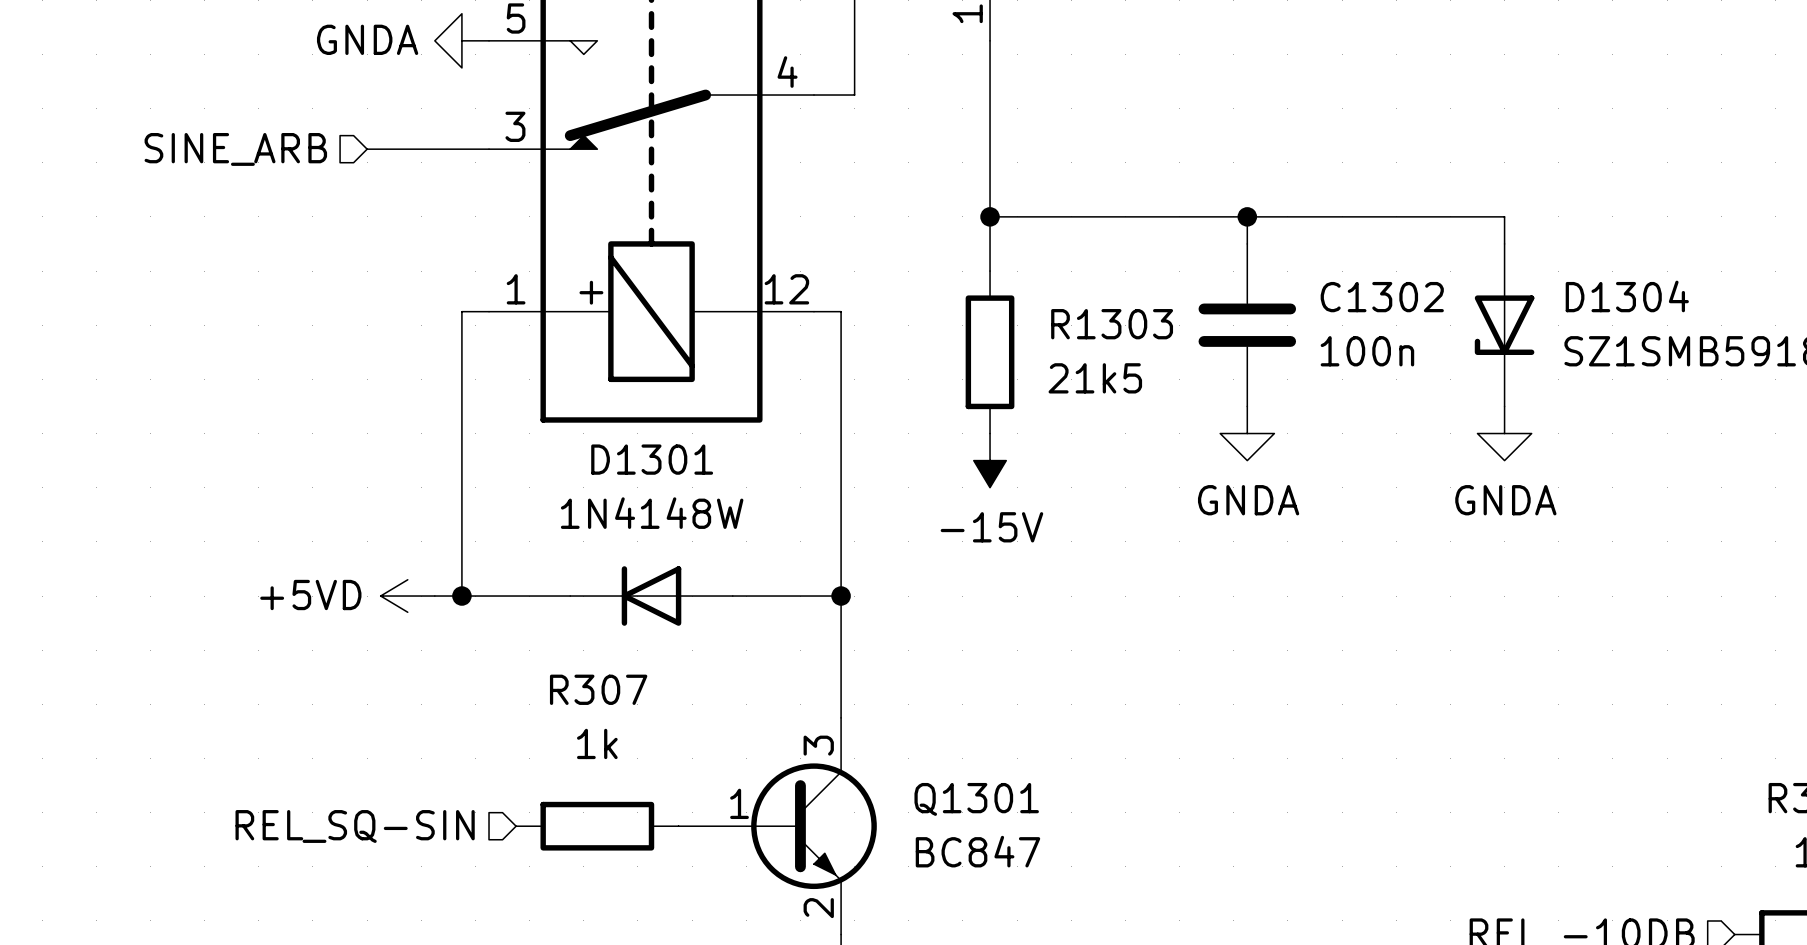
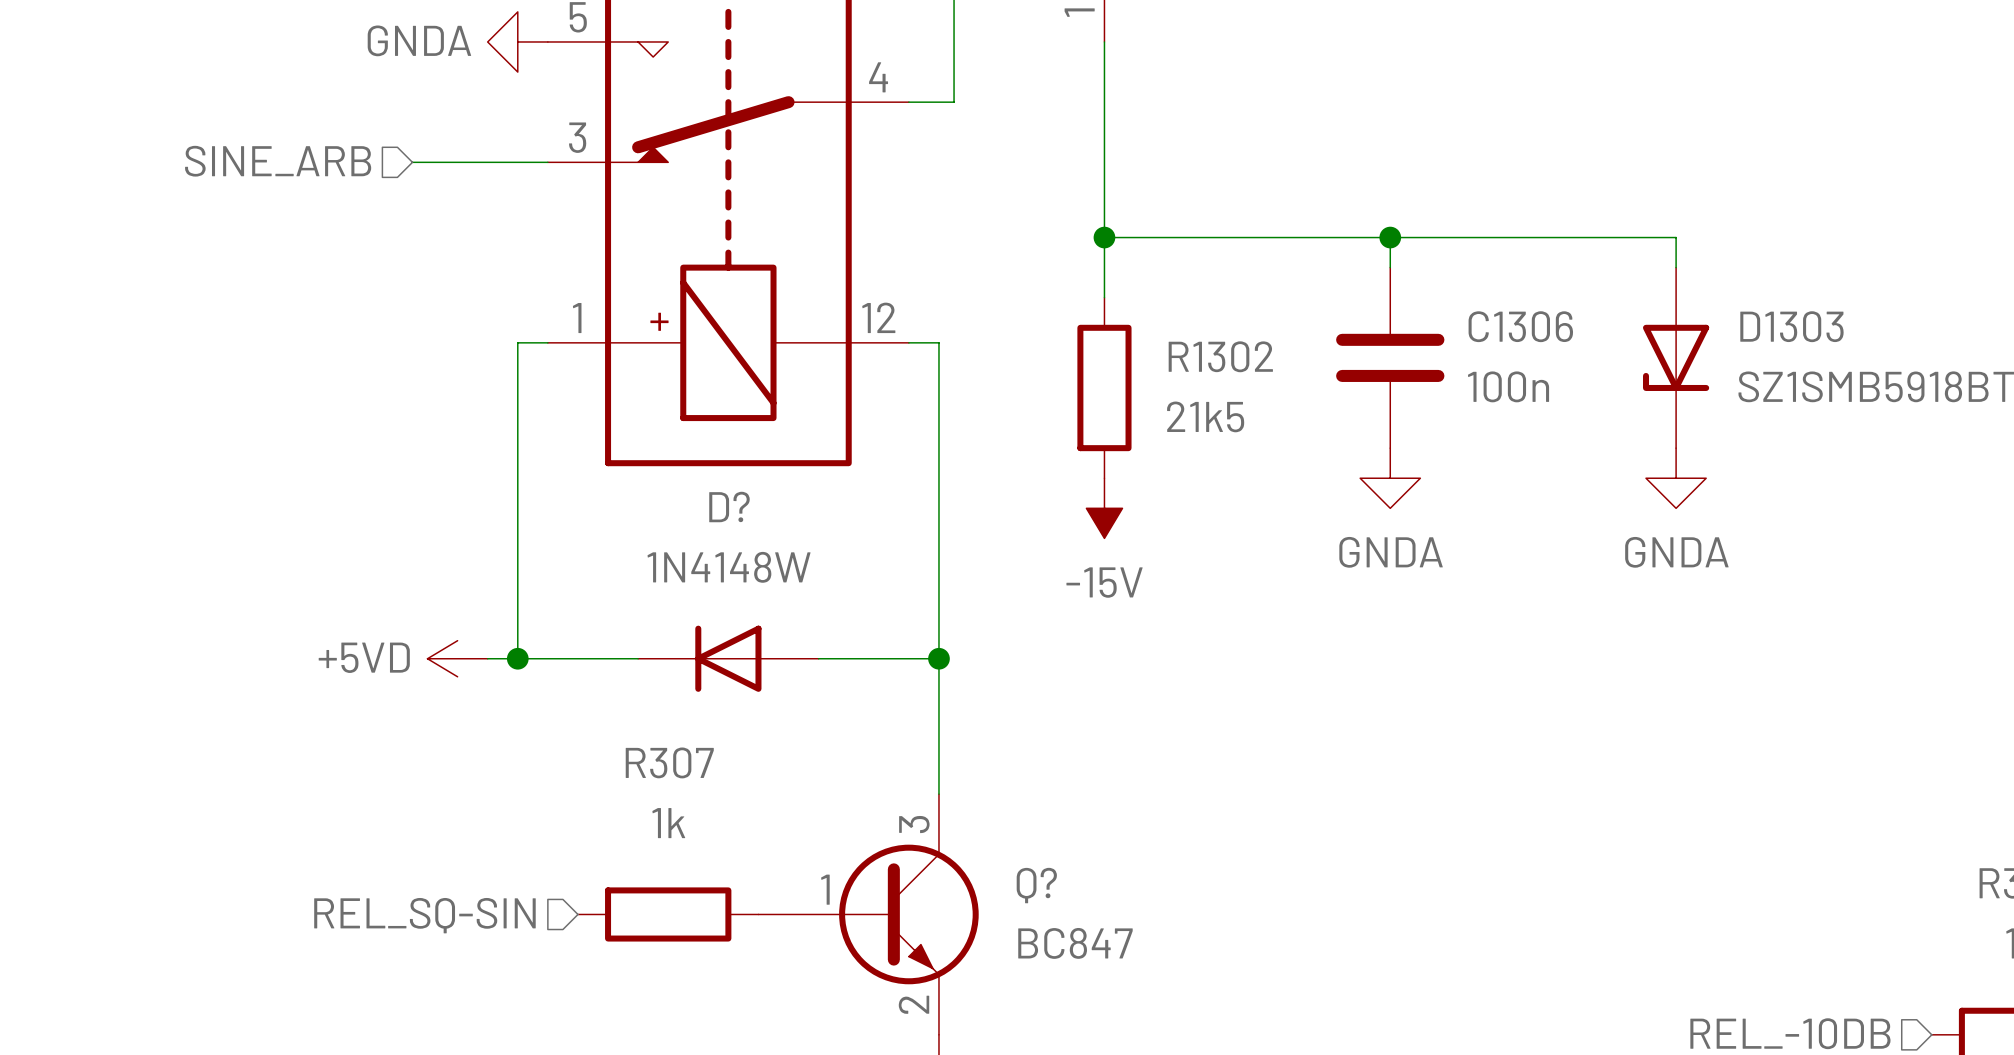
D1304 name: D1304 (1627, 296) -> D1303 (1791, 326)
C1302 name: C1302 (1382, 297) -> C1306 (1520, 326)
R1303 name: R1303 (1112, 324) -> R1302 (1220, 356)
D1301 name: D1301 (652, 459) -> D? (729, 507)
Q1301 name: Q1301 (976, 799) -> Q? (1036, 885)

